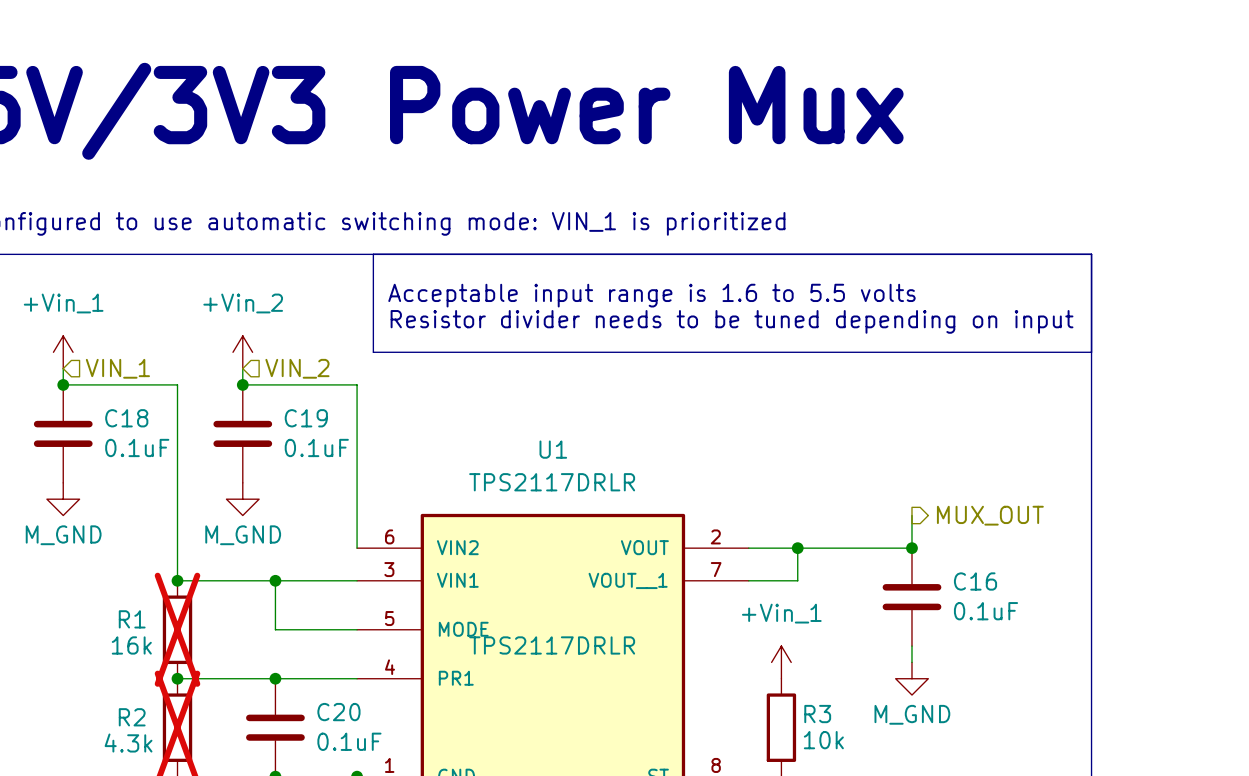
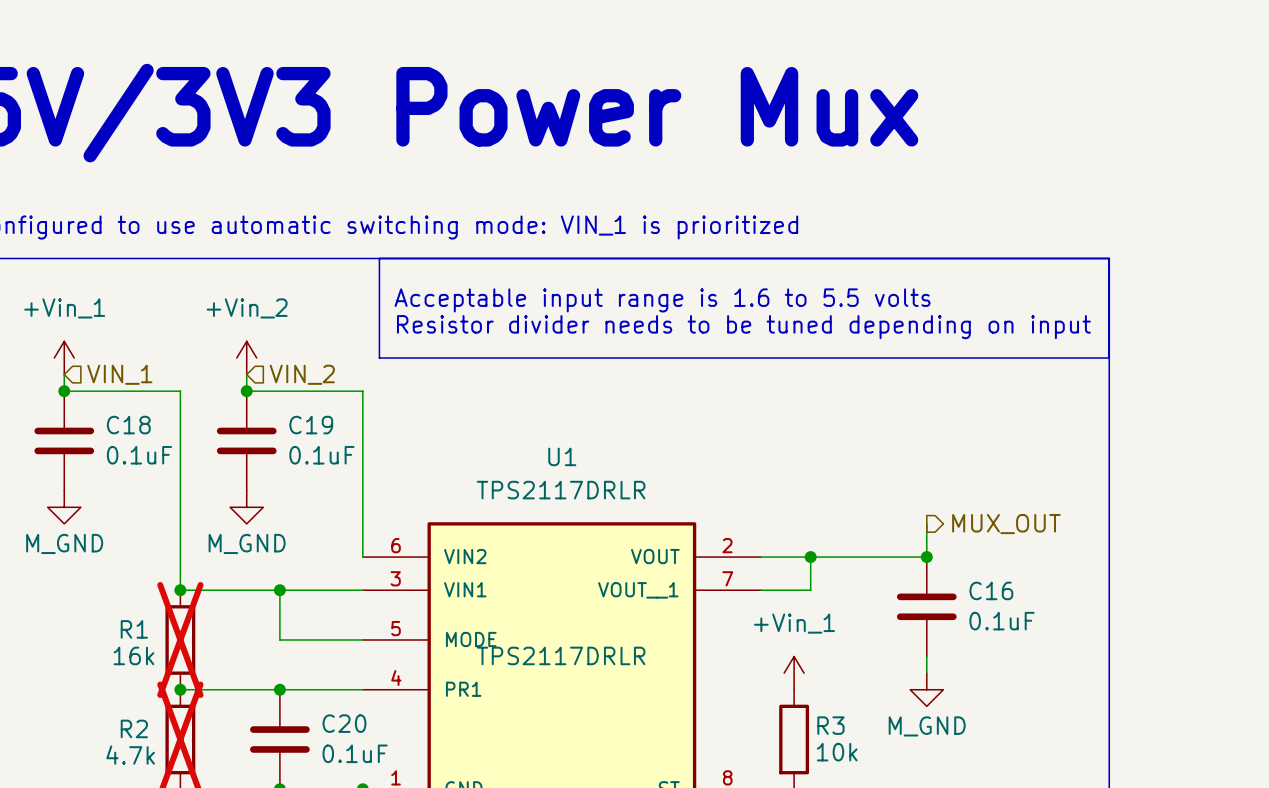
R2 value: 4.3k (128, 743) -> 4.7k (130, 755)

